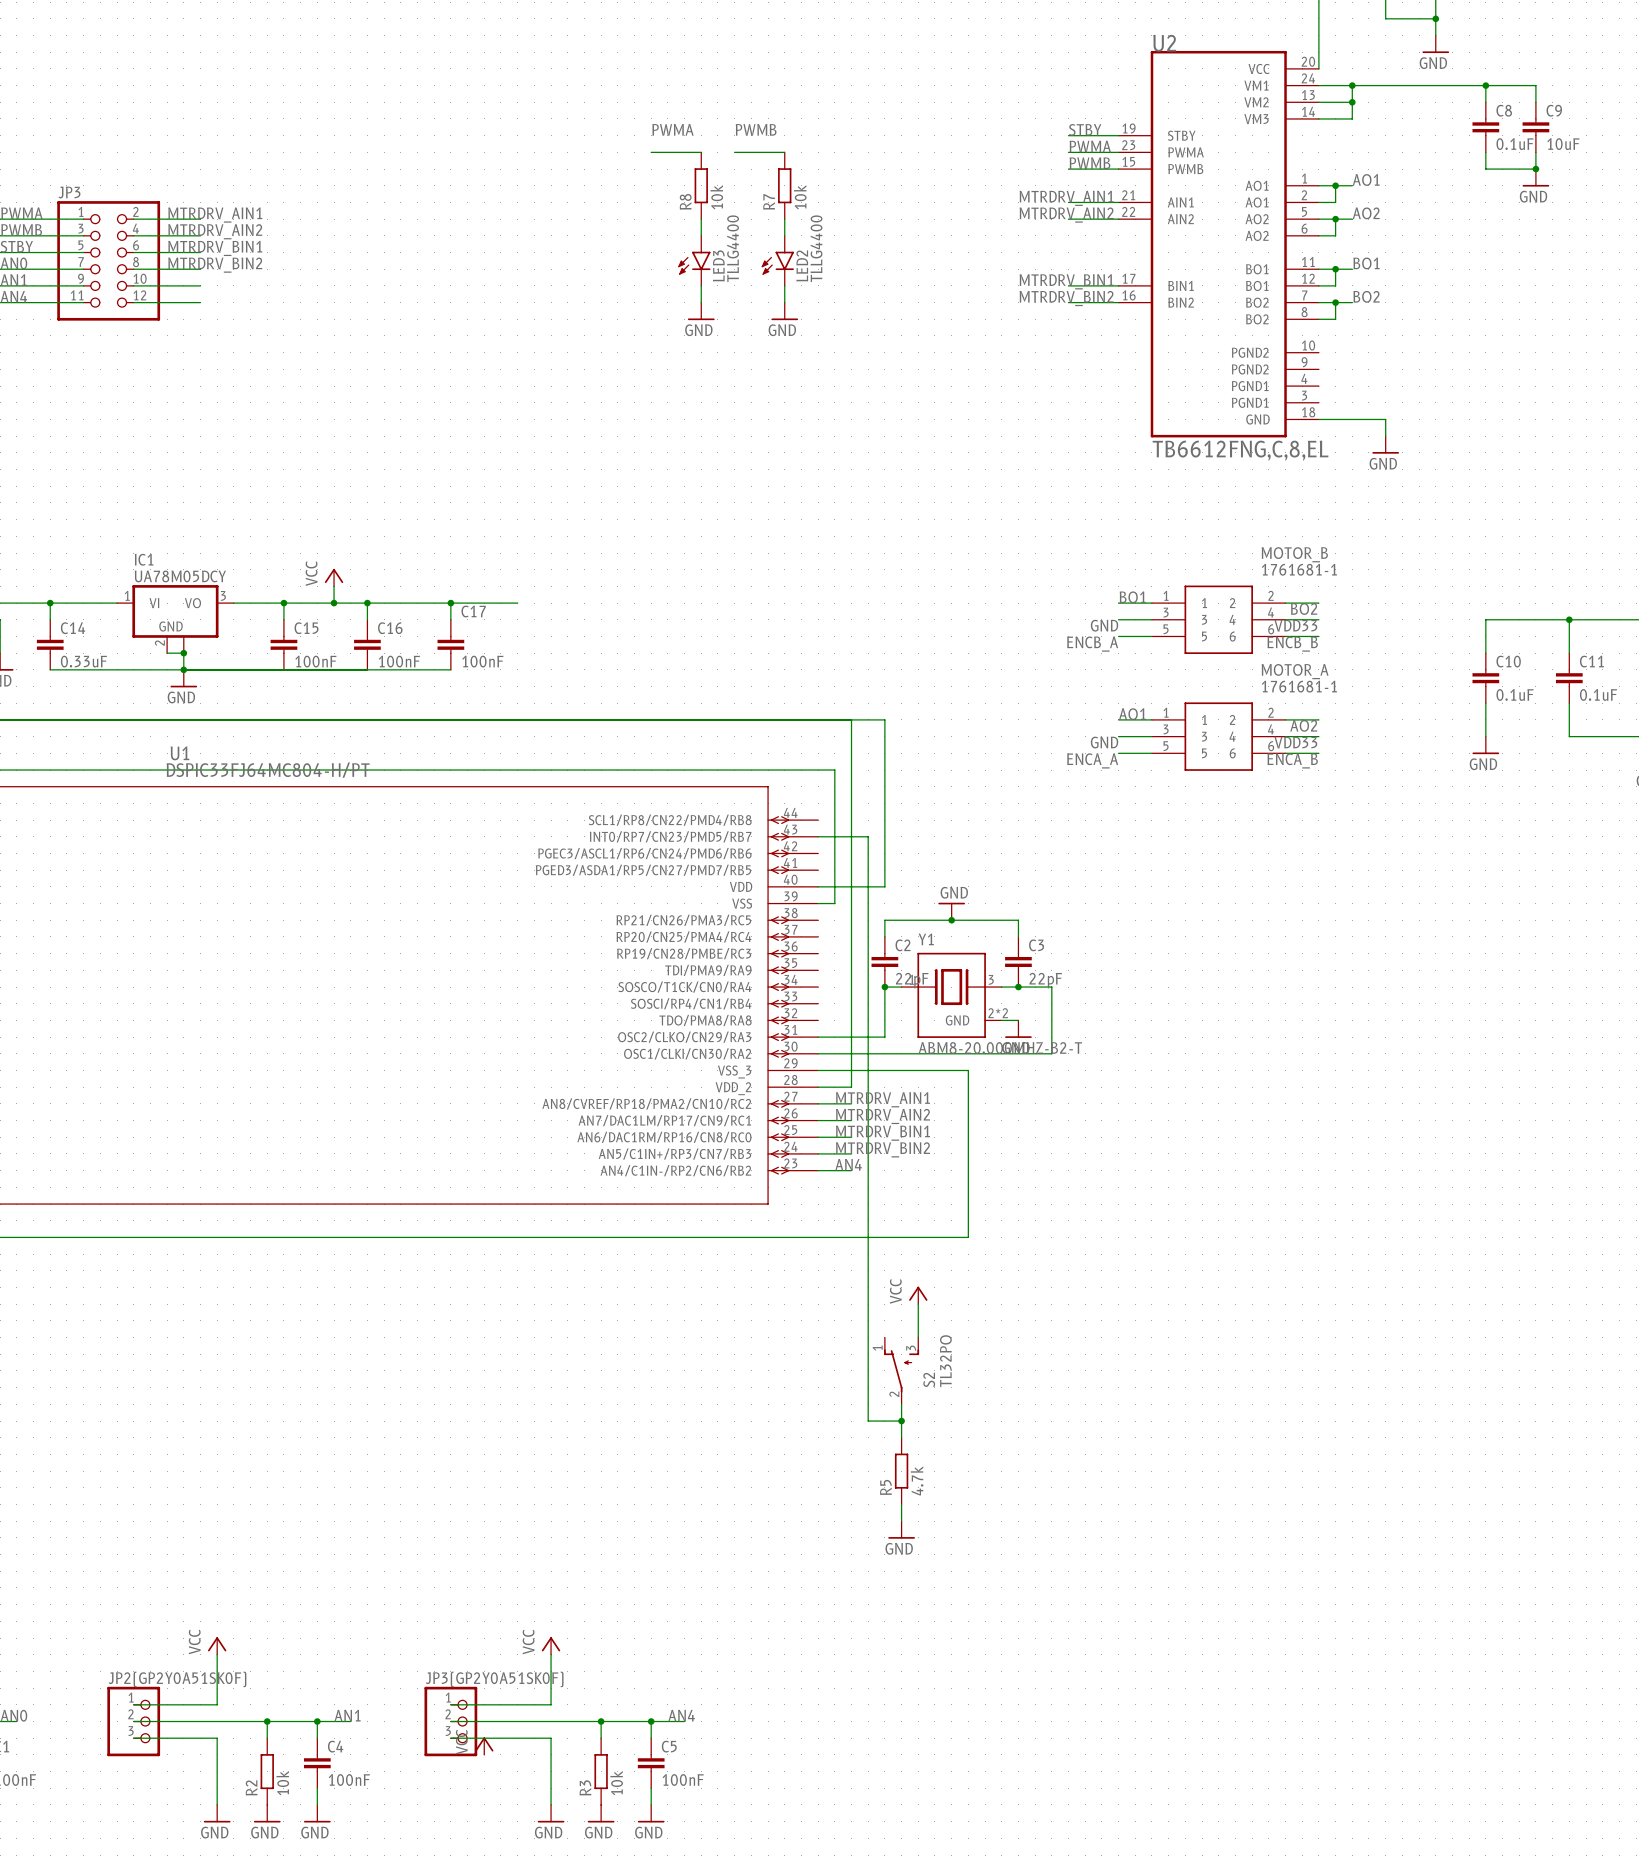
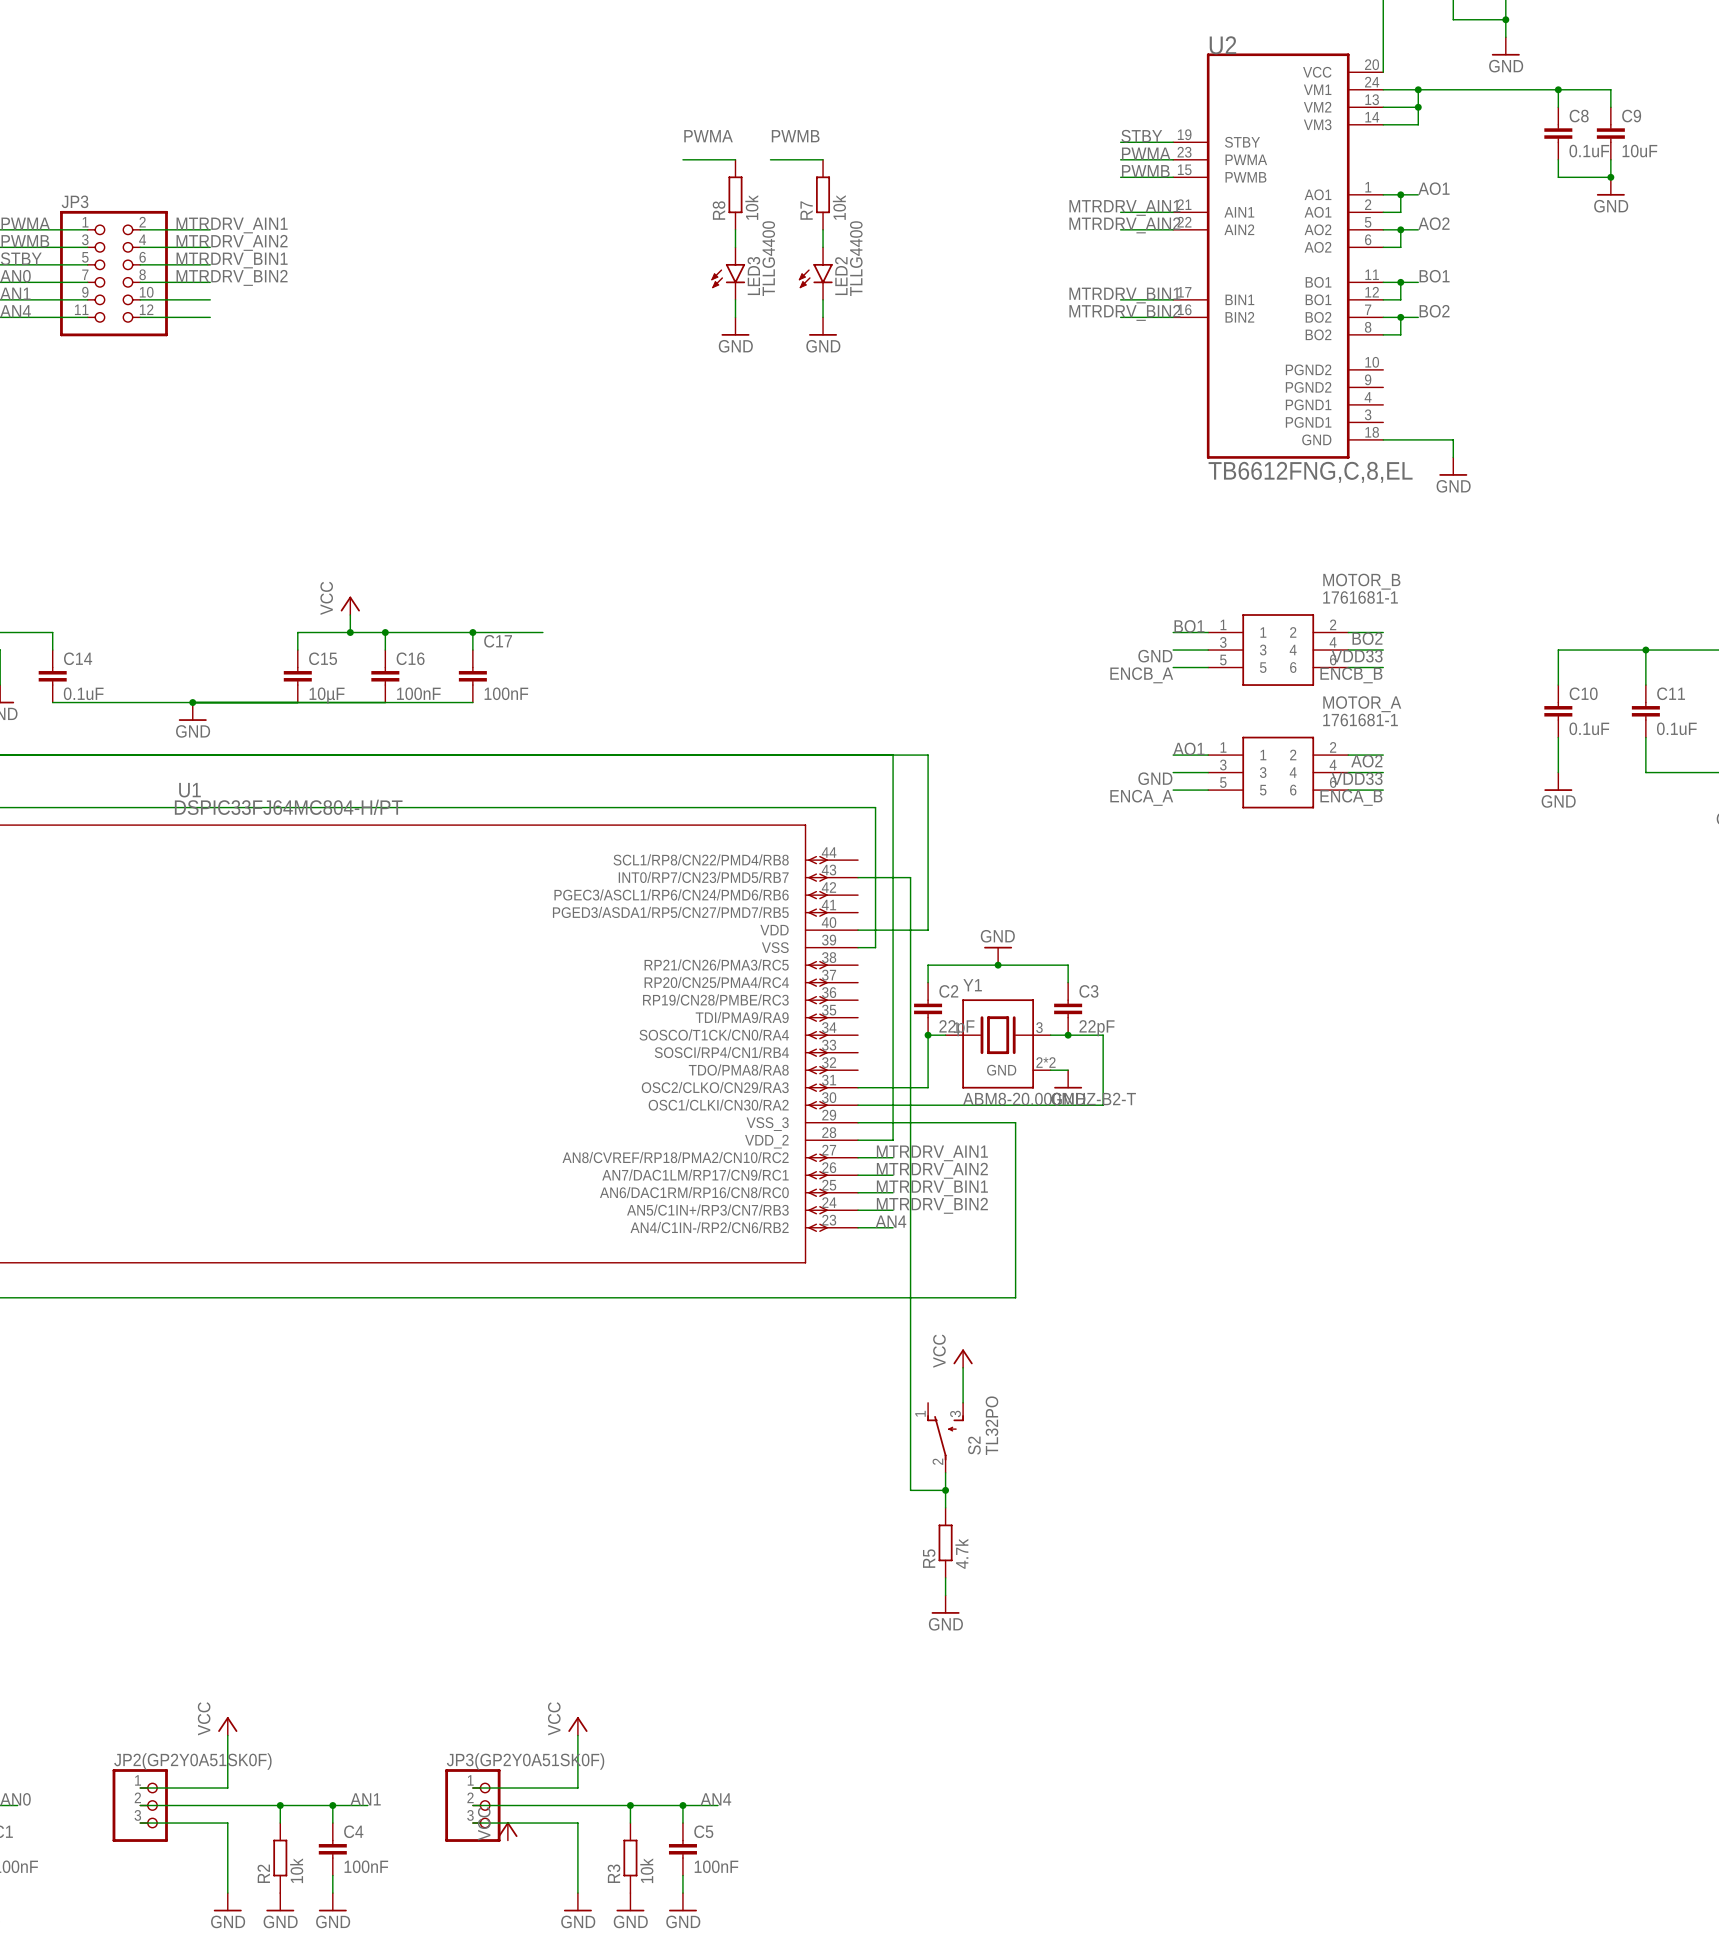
wire: (50, 603) (117, 603) -> none
junction: (50, 603) -> none
wire: (233, 603) (283, 603) -> none
junction: (283, 603) -> none
IC1: UA78M05DCY (175, 619) -> none
wire: (167, 653) (183, 653) (183, 669) -> none
junction: (183, 653) -> none
C14 value: 0.33uF (83, 661) -> 0.1uF (83, 693)
C15 value: 100nF (315, 661) -> 10µF (327, 695)

